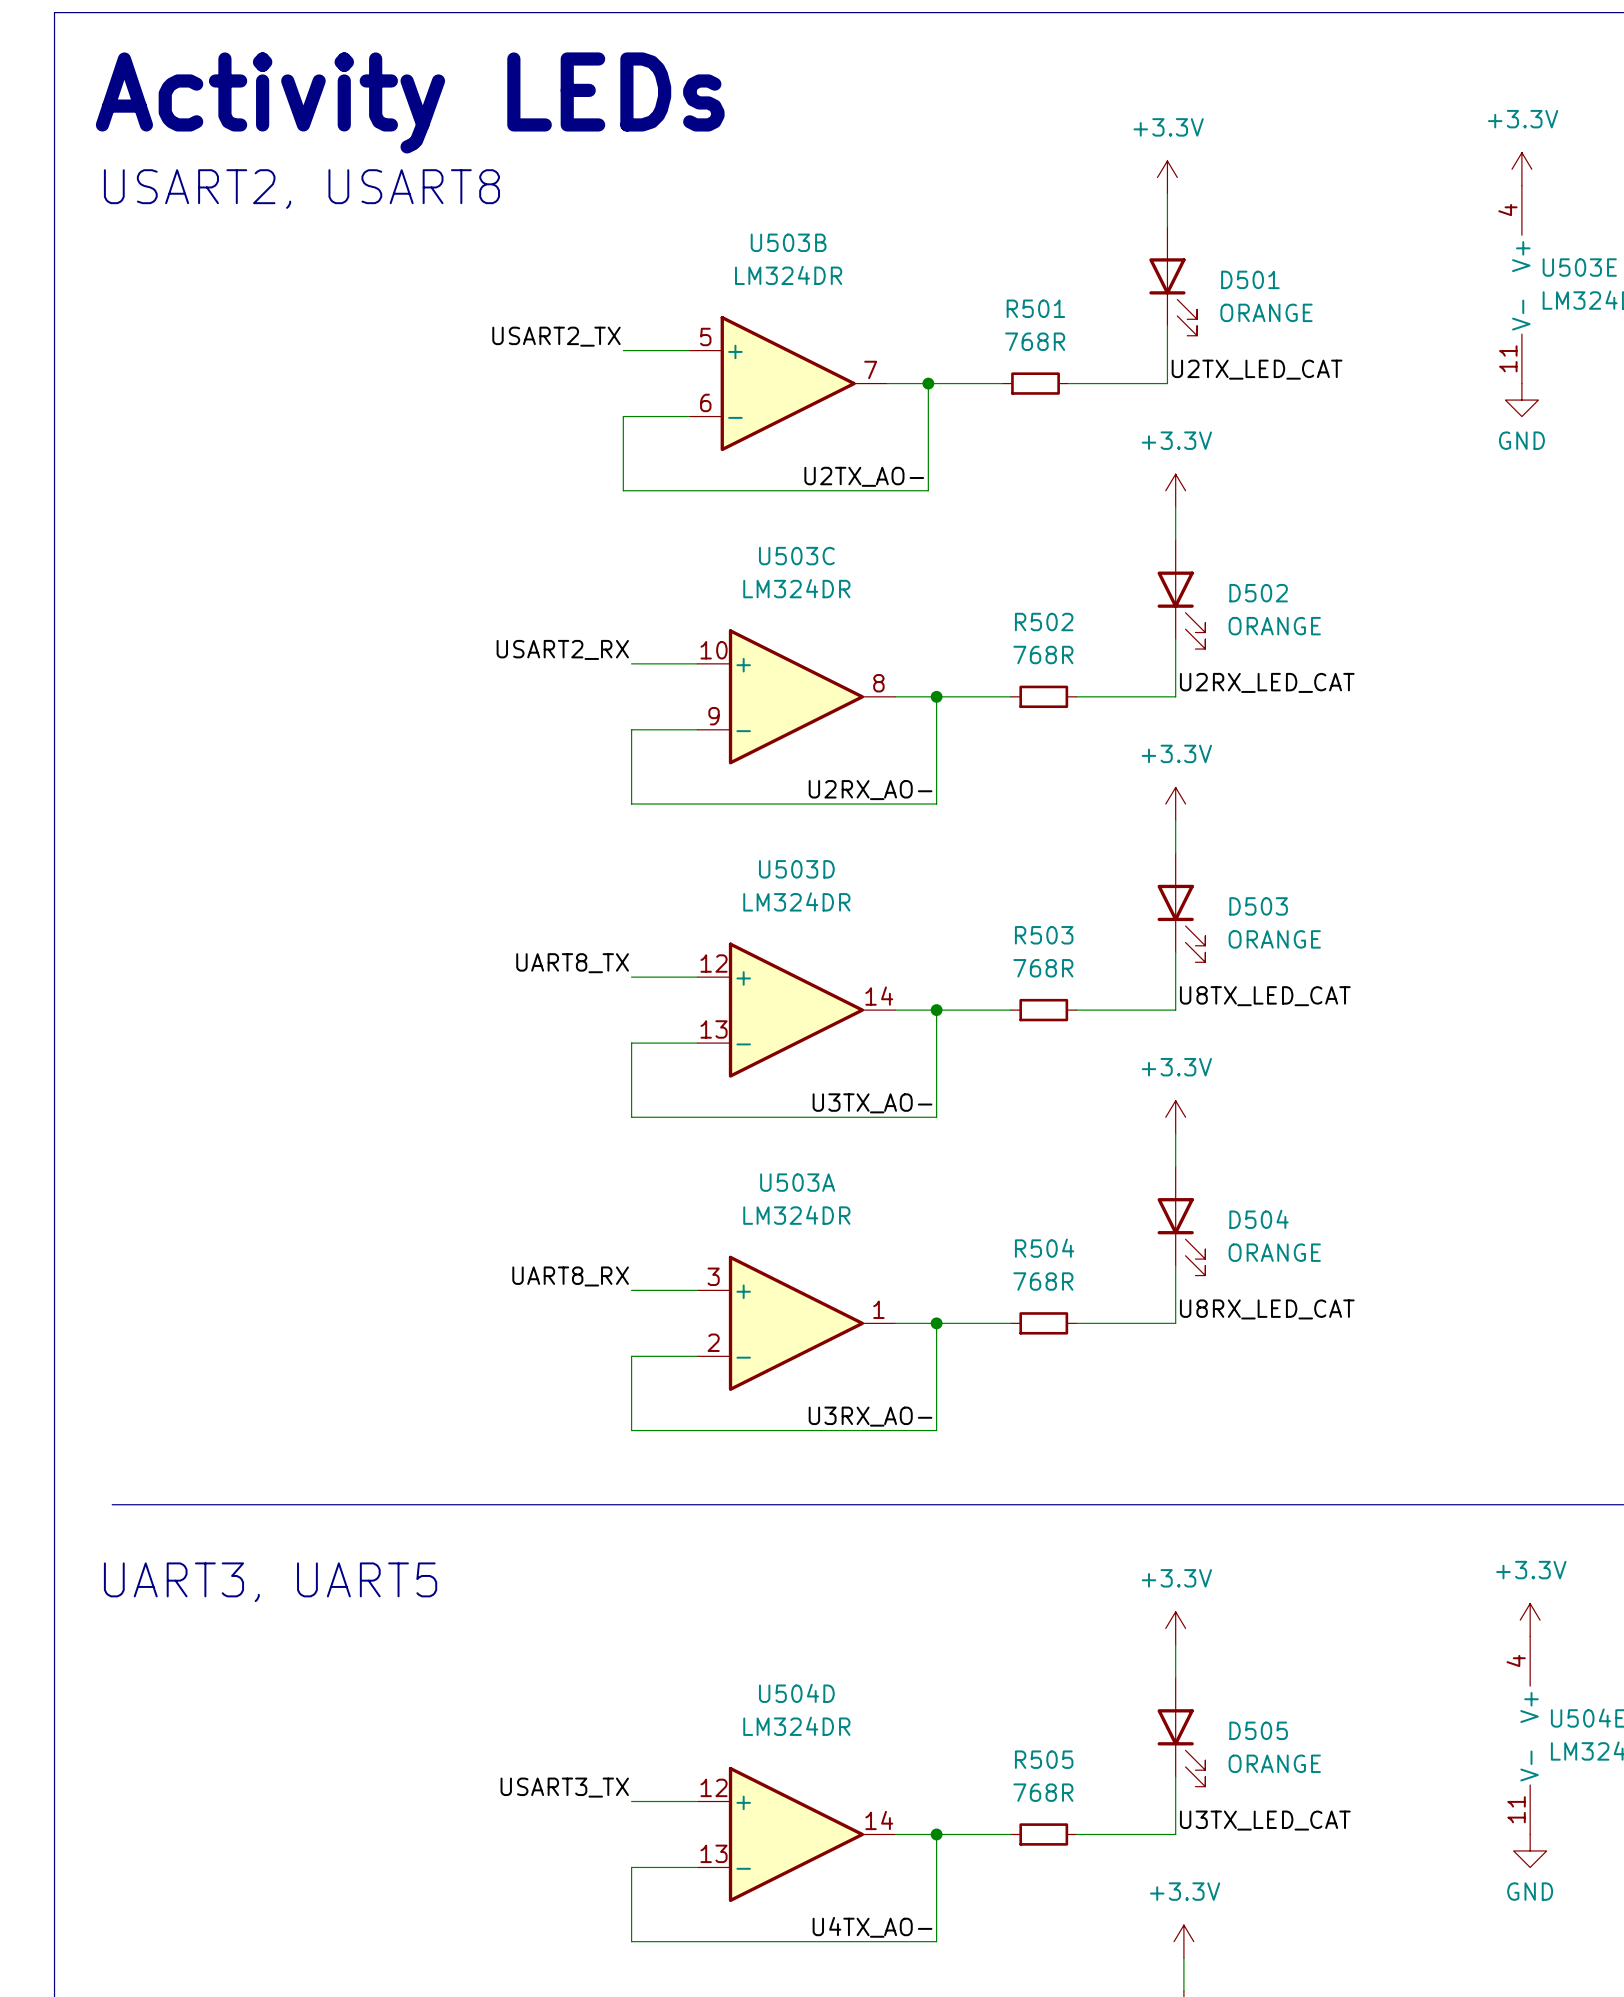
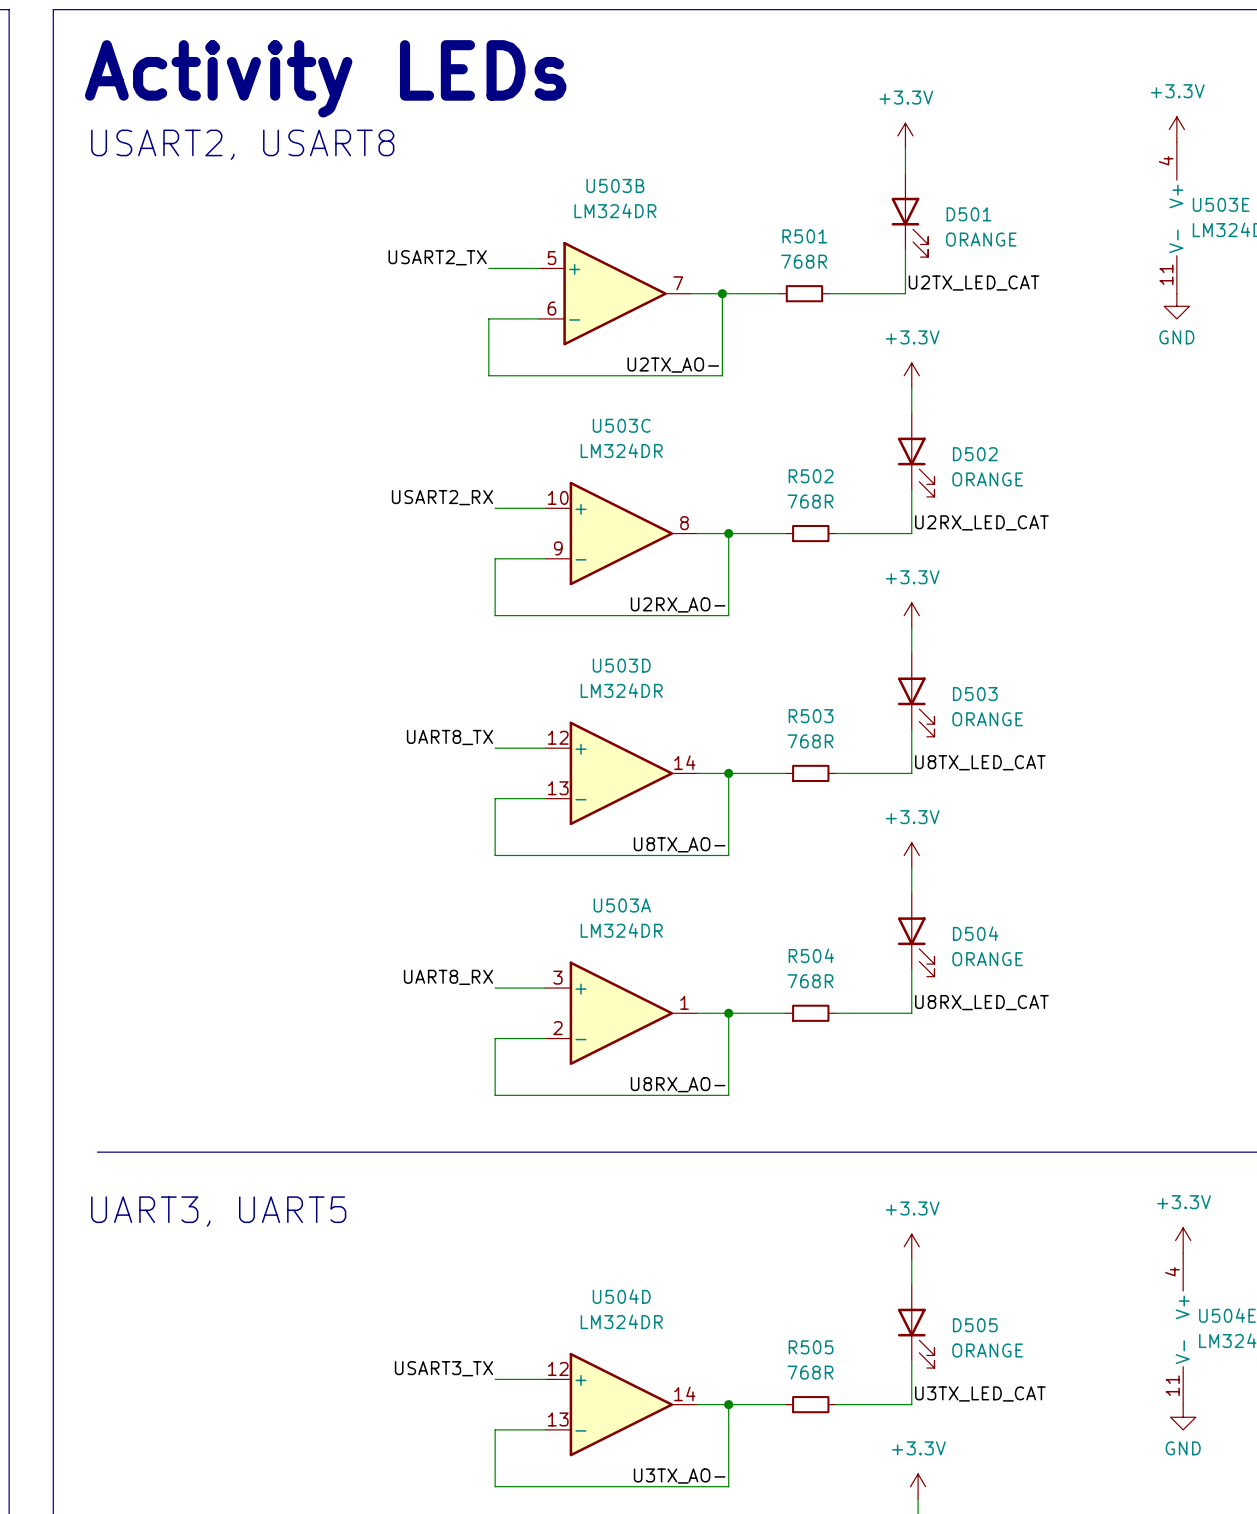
label: U3TX_AO- (872, 1103) -> U8TX_AO- (679, 844)
label: U3RX_AO- (870, 1416) -> U8RX_AO- (678, 1084)
label: U4TX_AO- (872, 1927) -> U3TX_AO- (679, 1476)

